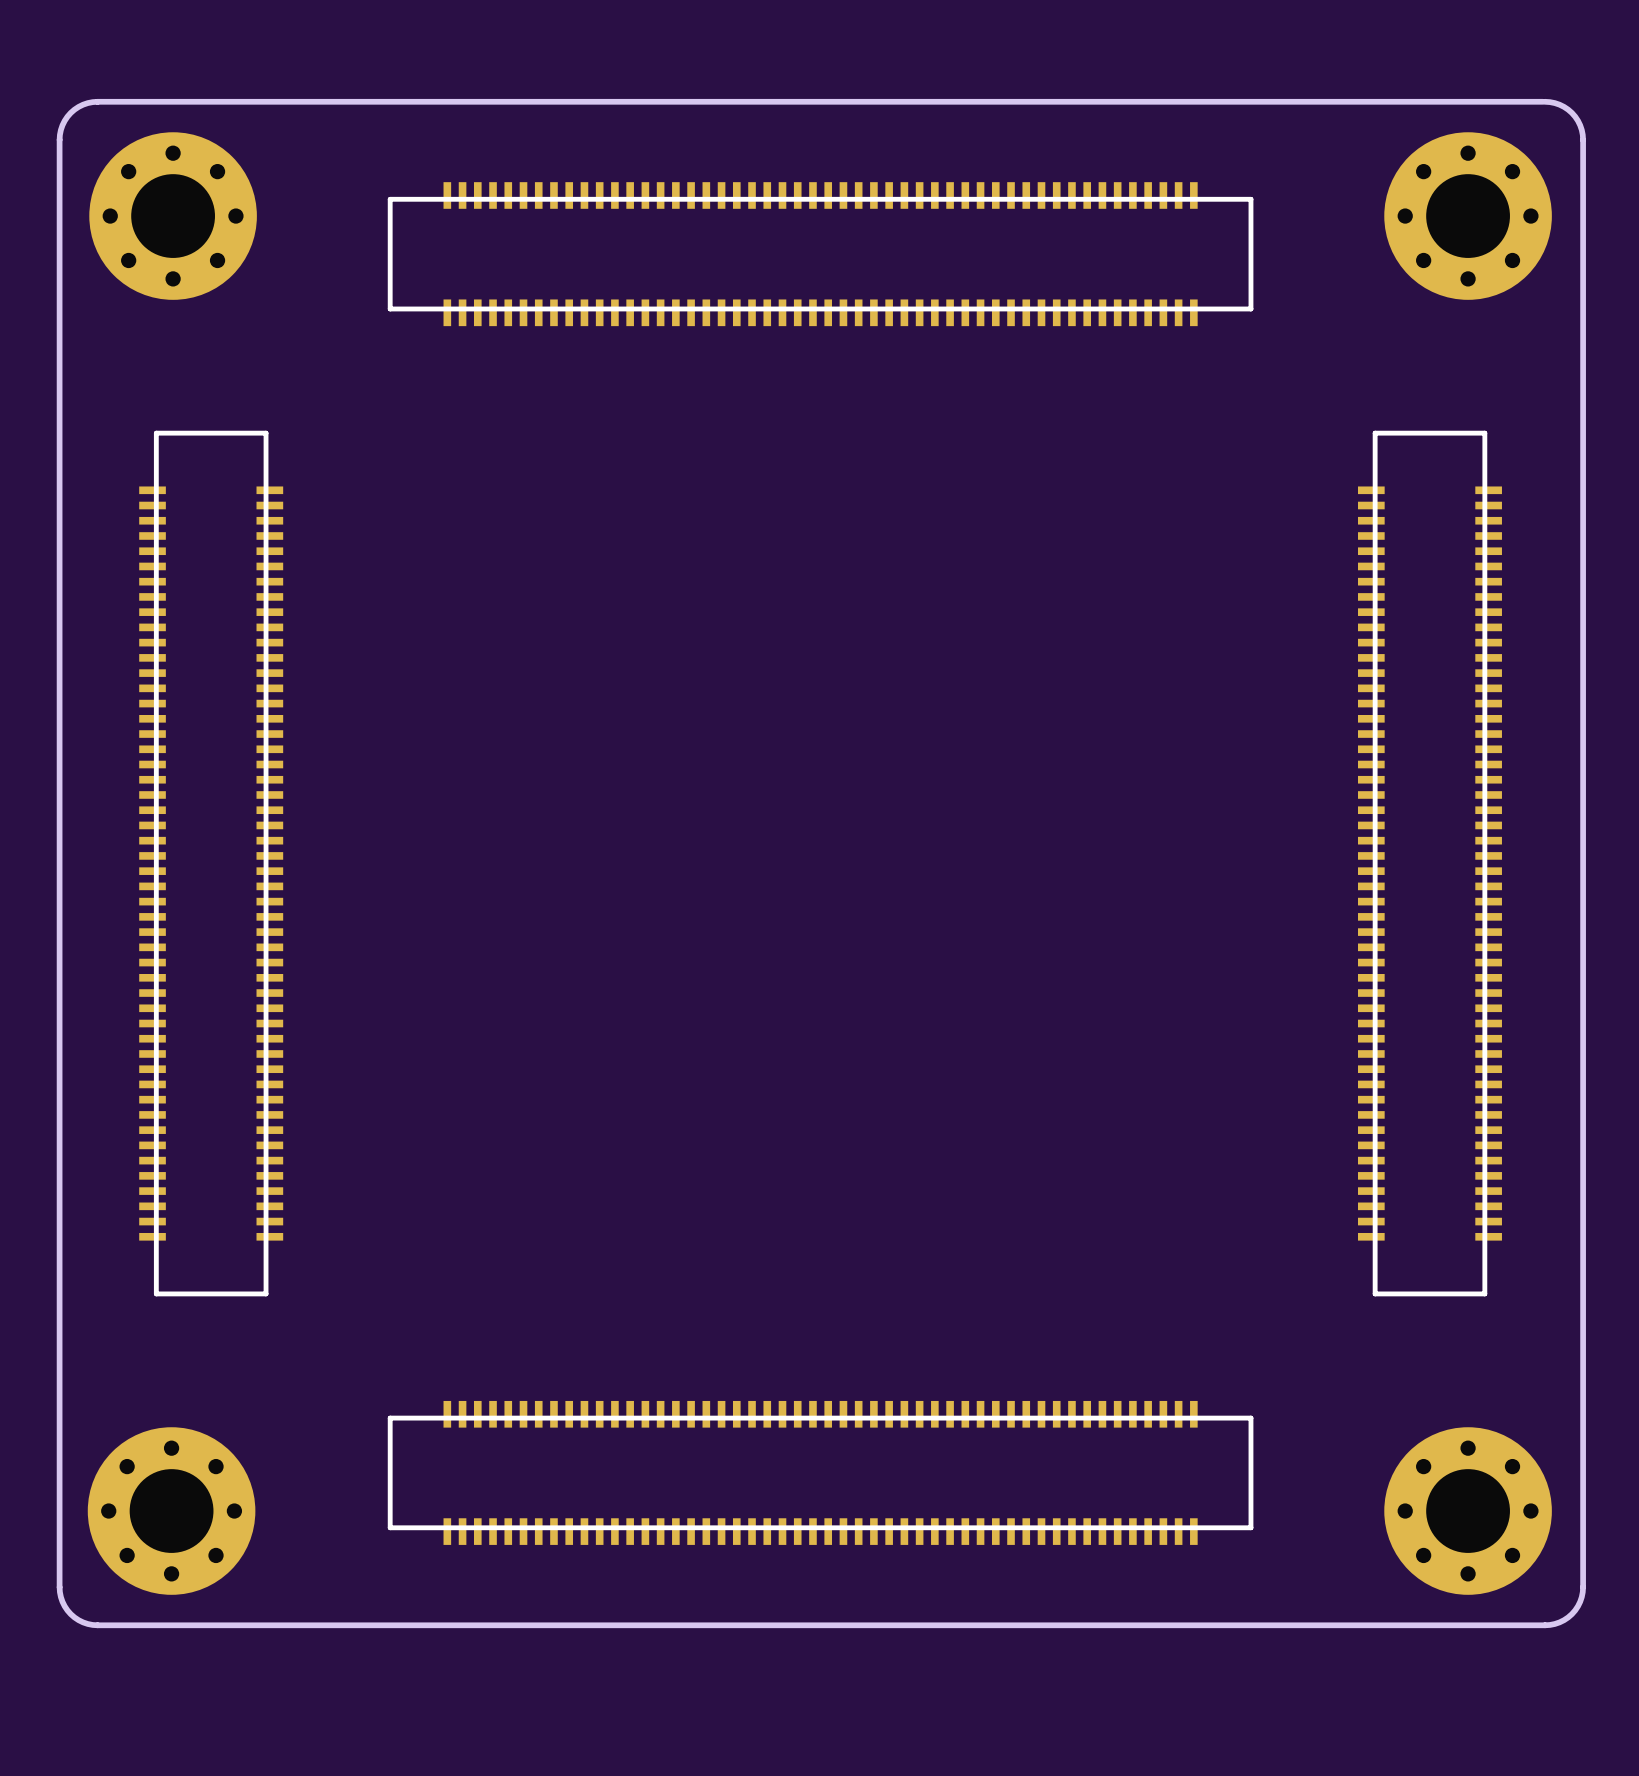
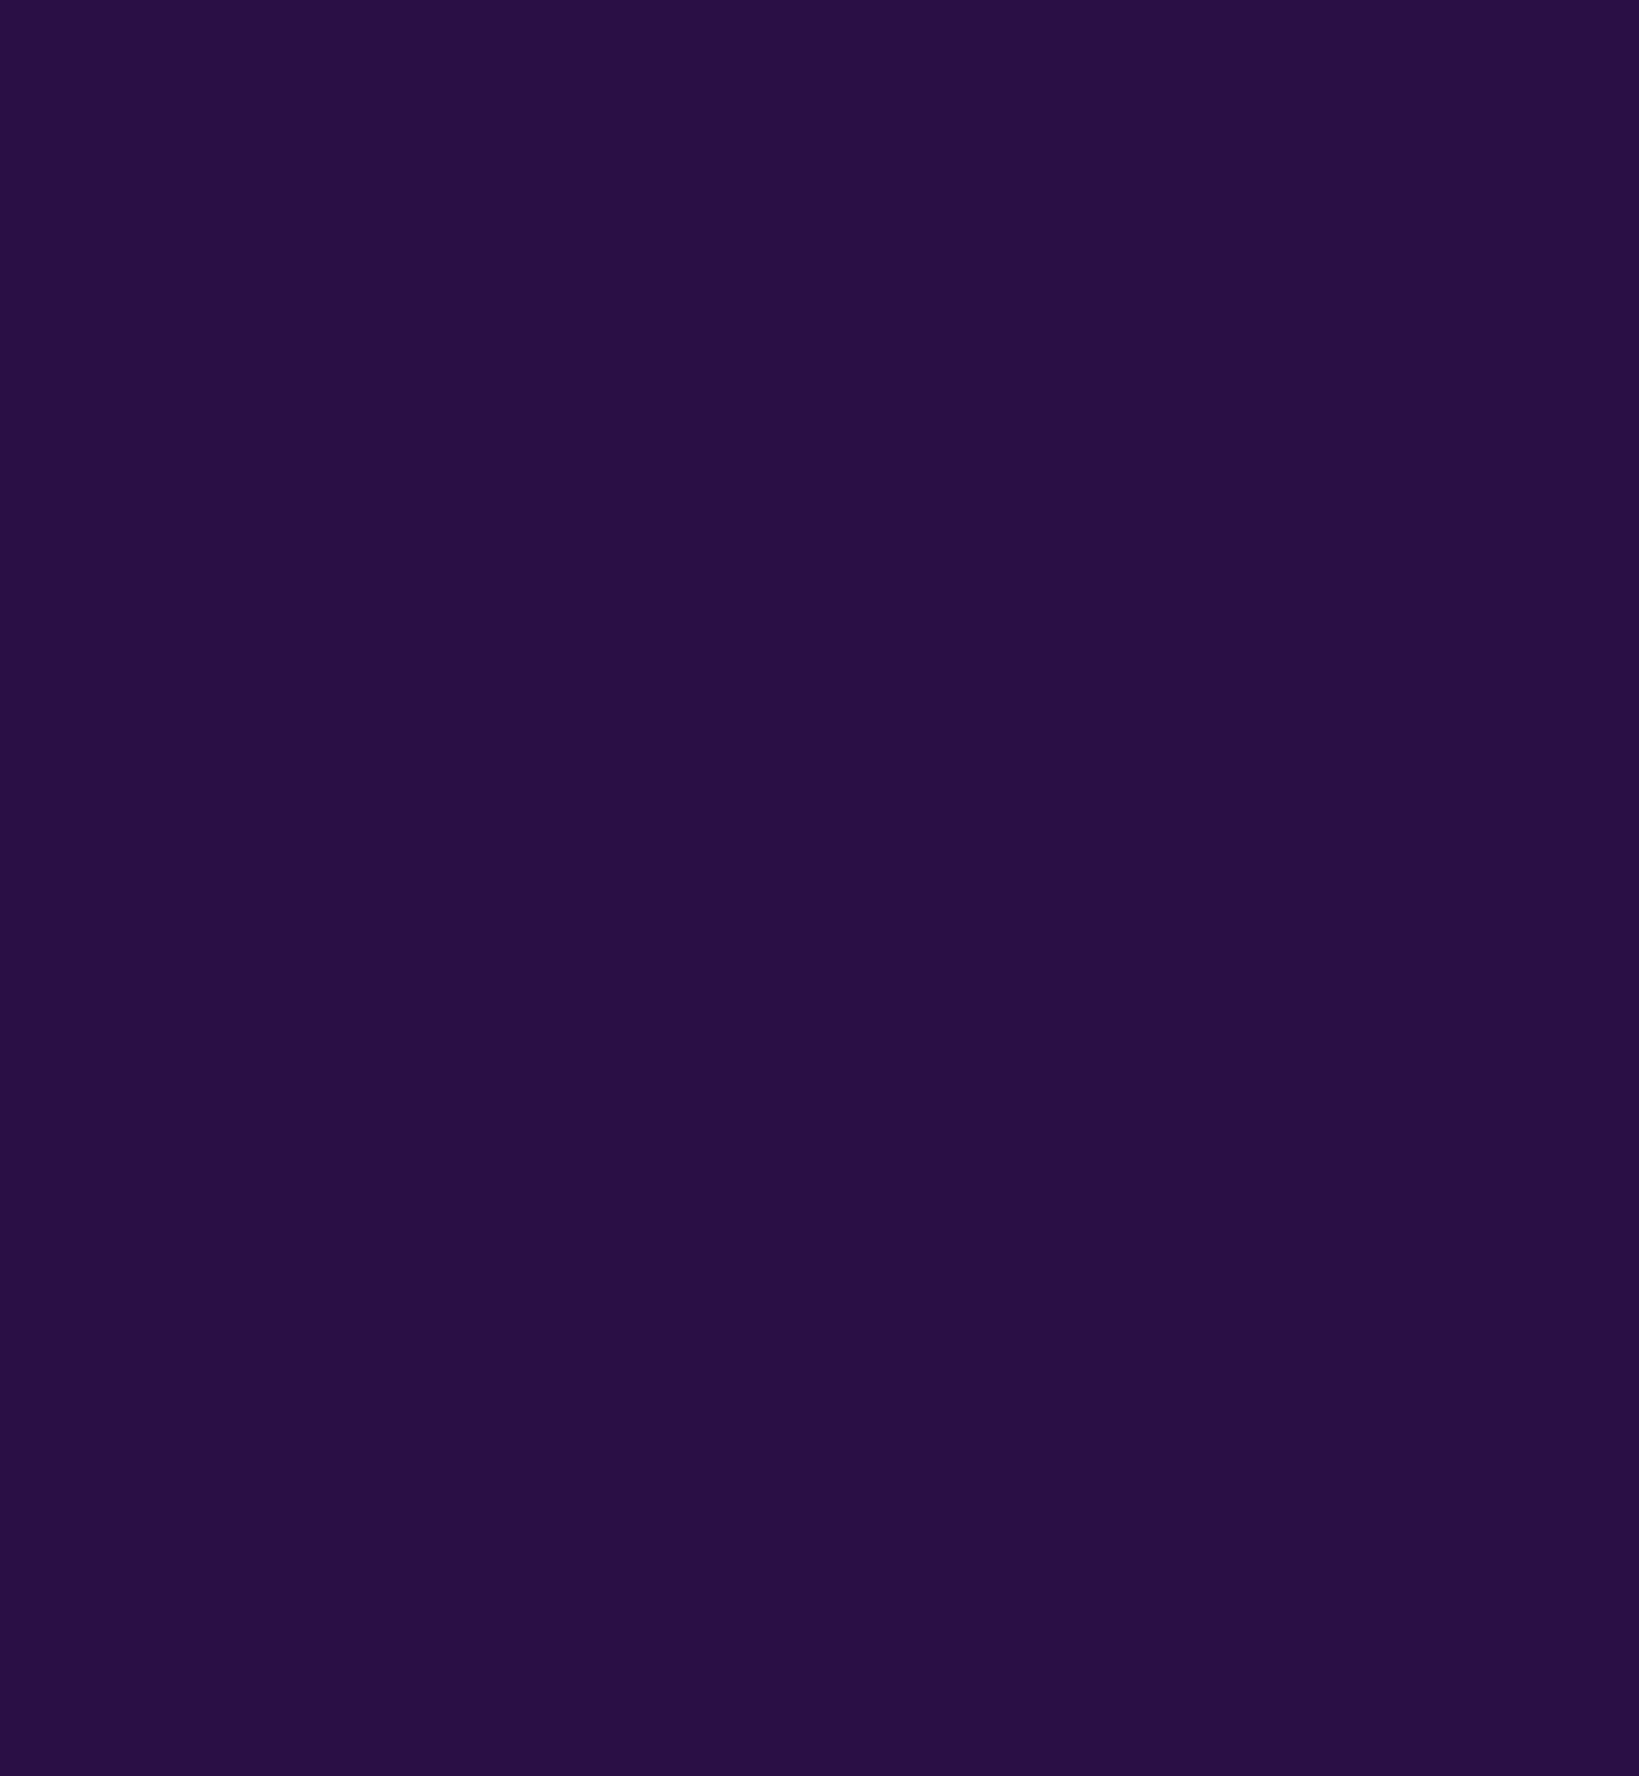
board edge: (1542, 101) (97, 101) (83, 104) (70, 112) (62, 125) (59, 139) (59, 1587) (62, 1601) (70, 1614) (83, 1622) (97, 1625) (1545, 1625) (1559, 1622) (1571, 1614) (1580, 1601) (1583, 1587) (1583, 139) (1580, 125) (1571, 112) (1559, 104) (1545, 101) -> none
part: (173, 216) -> none
part: (1468, 216) -> none
part: (820, 254) -> none
part: (211, 863) -> none
part: (1429, 863) -> none
part: (820, 1472) -> none
part: (171, 1511) -> none
part: (1468, 1511) -> none

